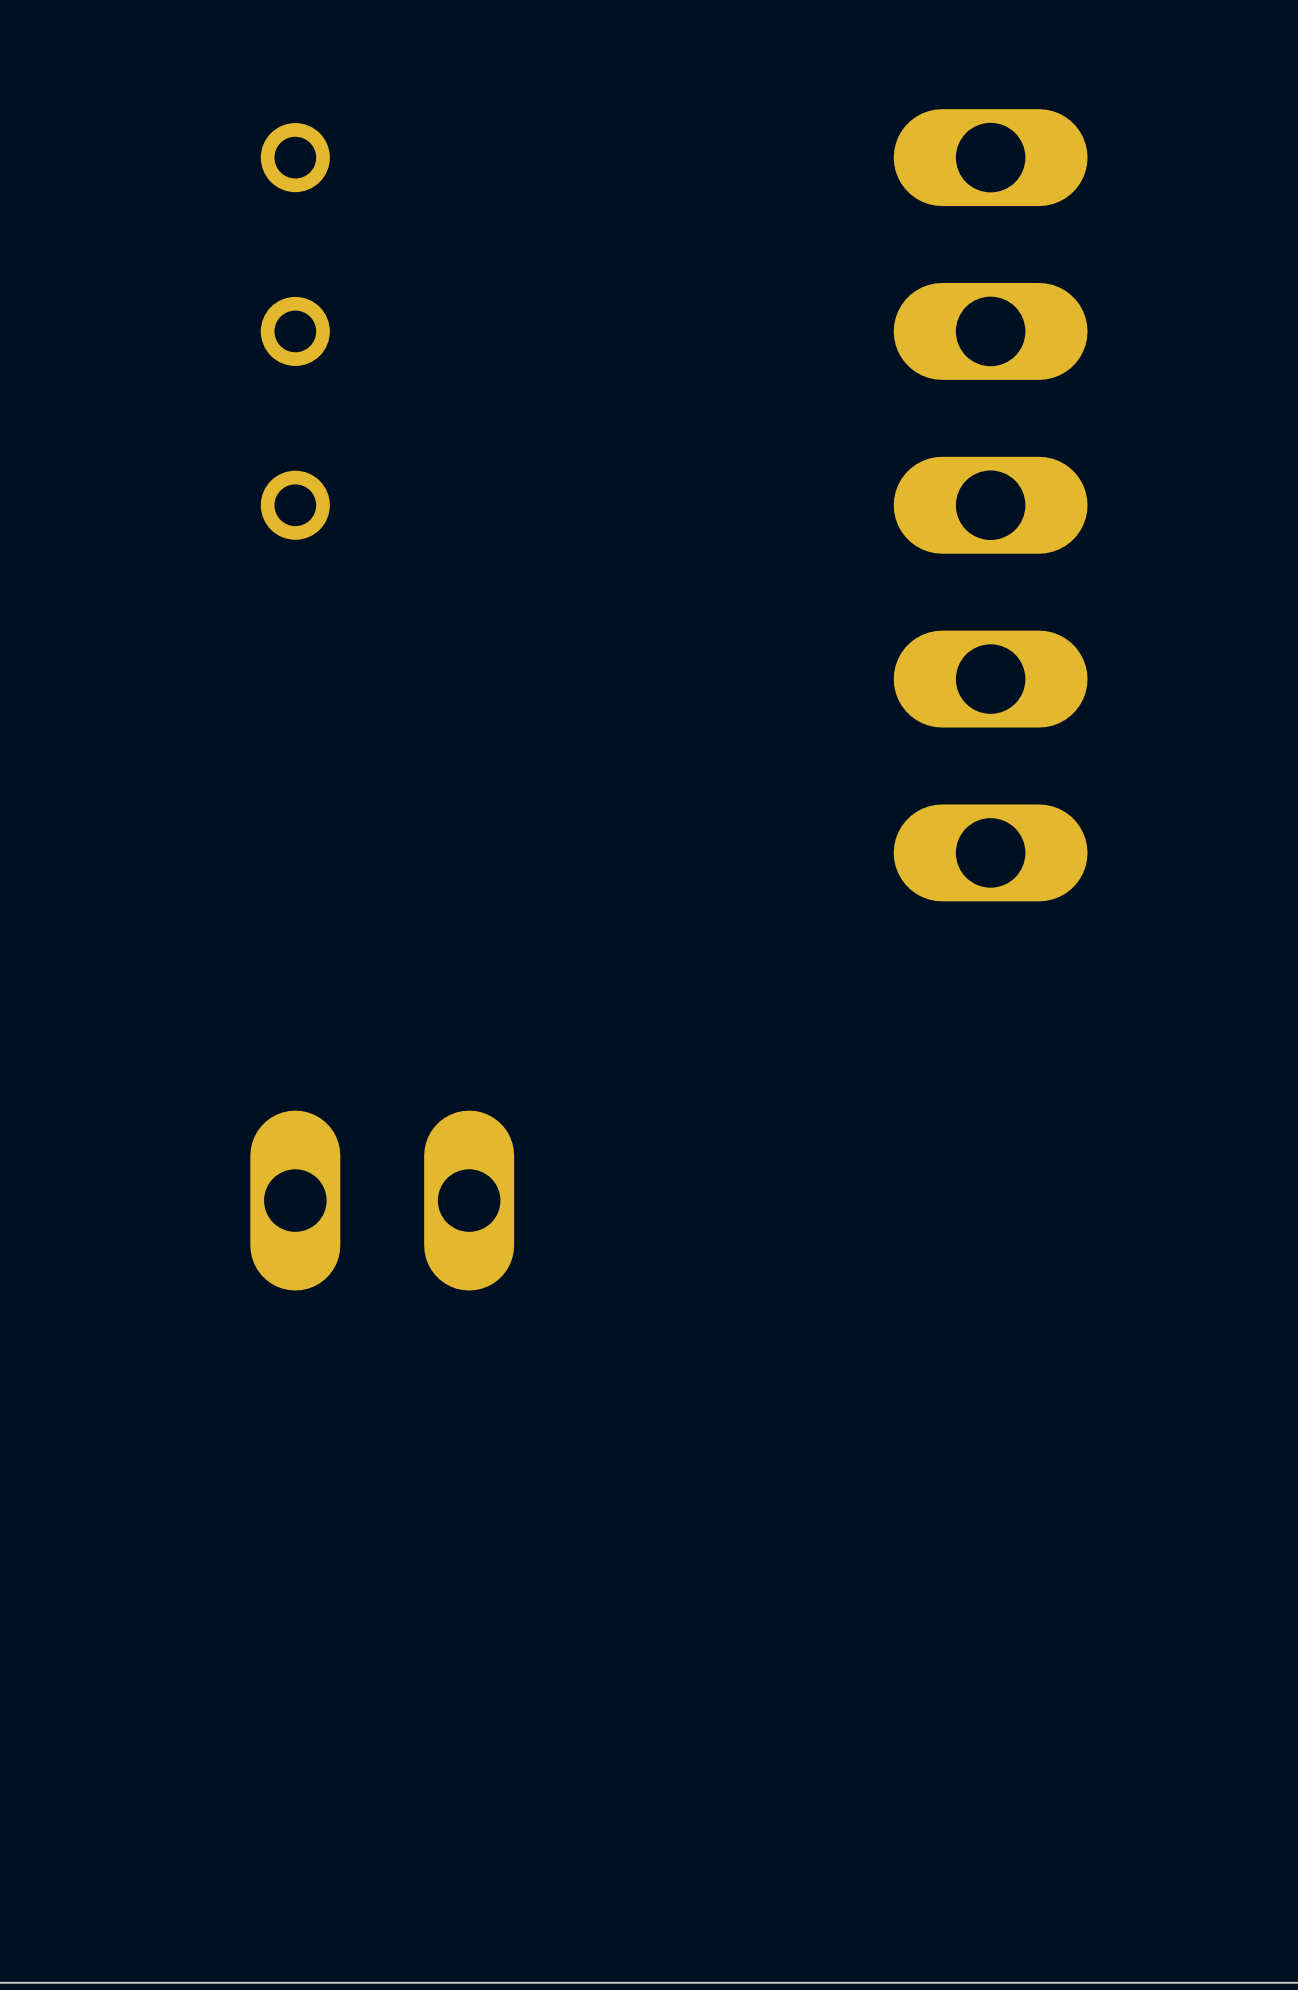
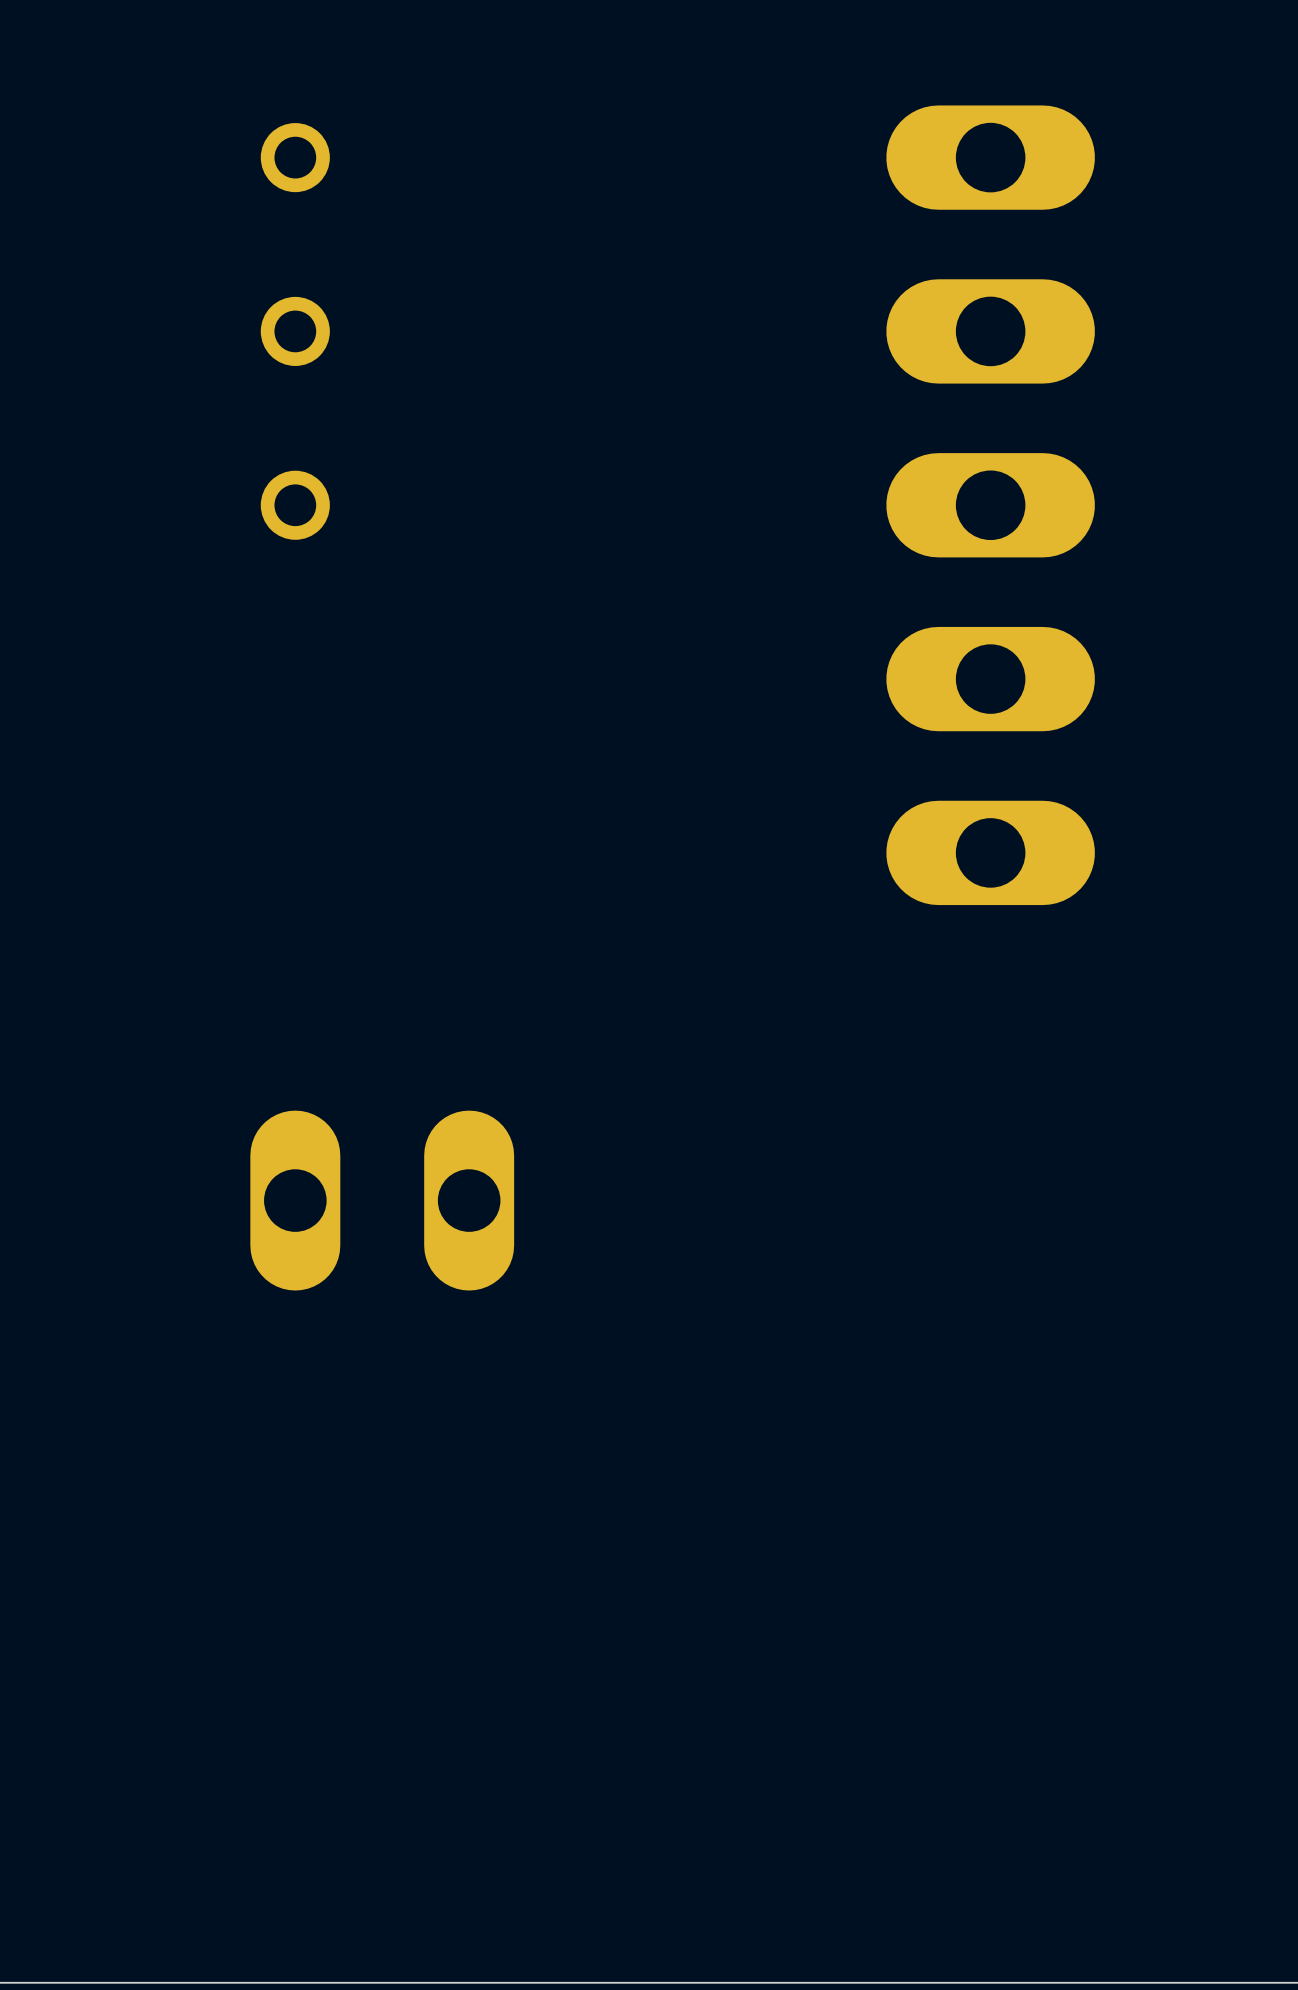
part footprint: [893, 109, 1088, 902] -> [886, 105, 1095, 906]

